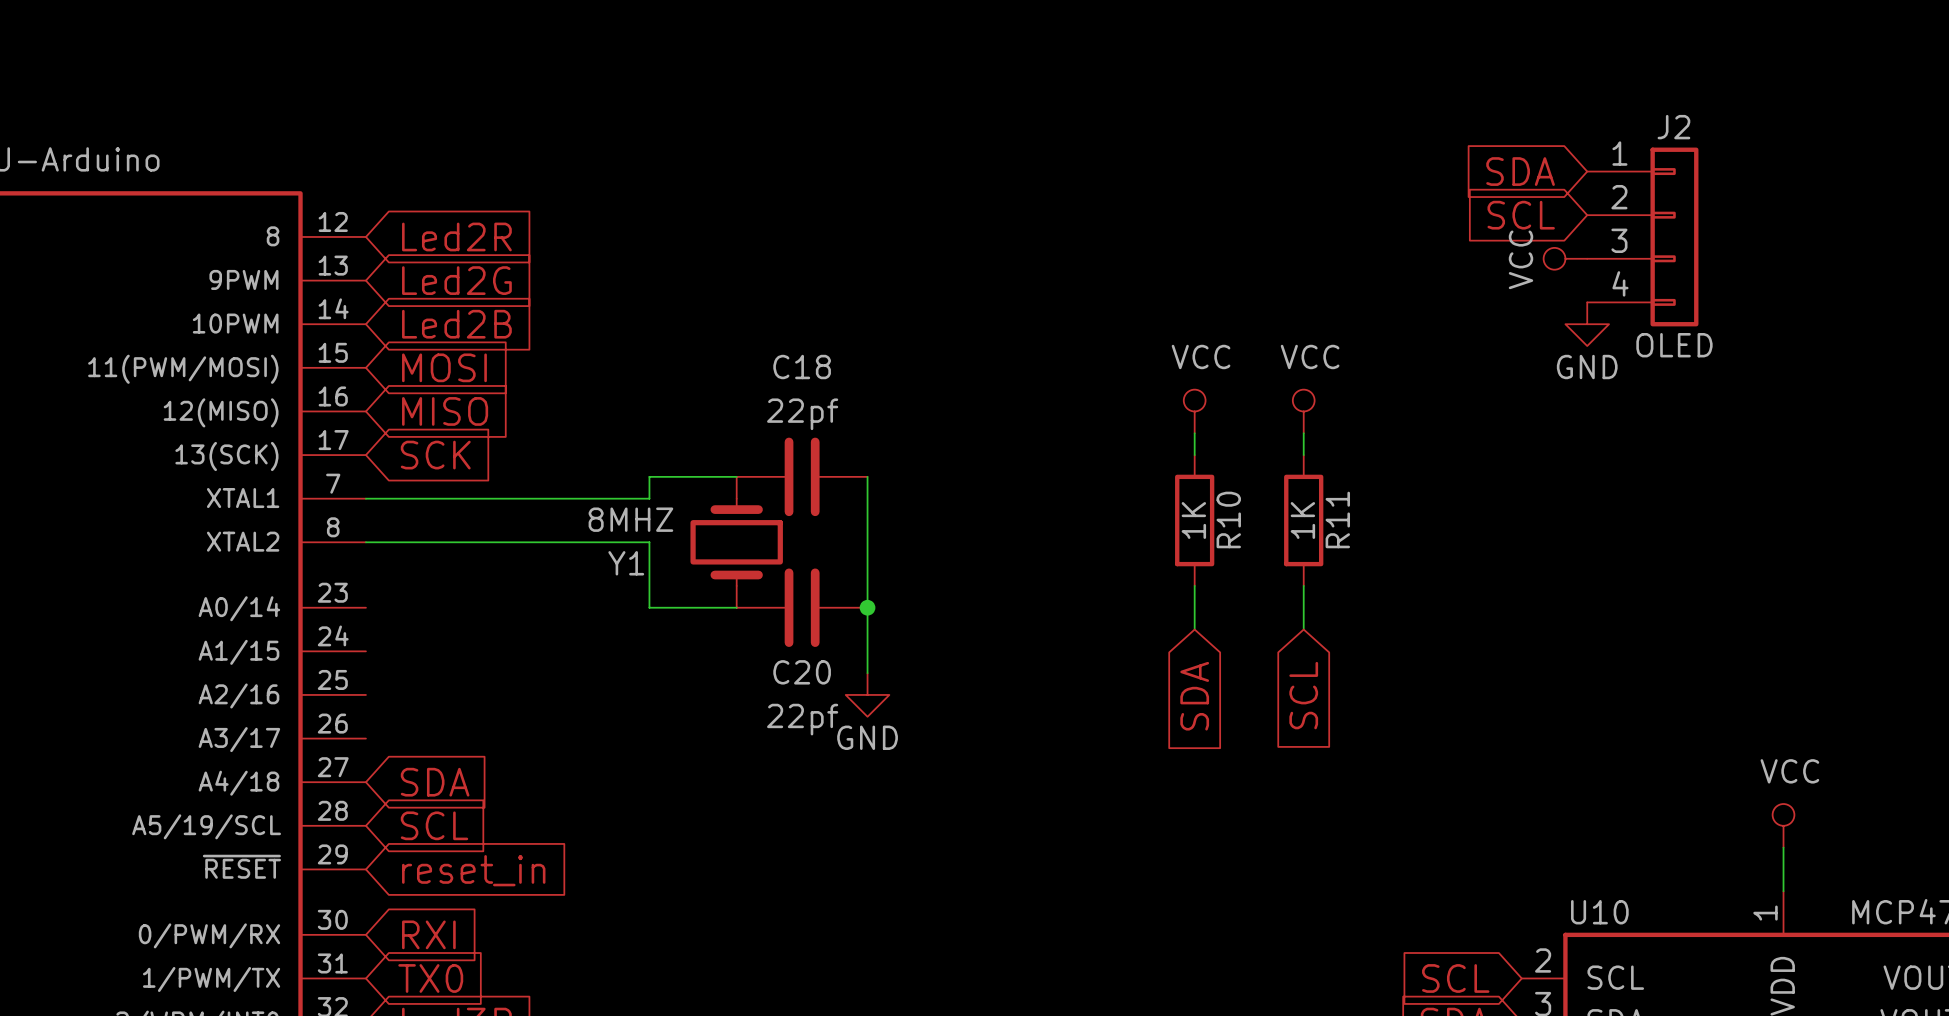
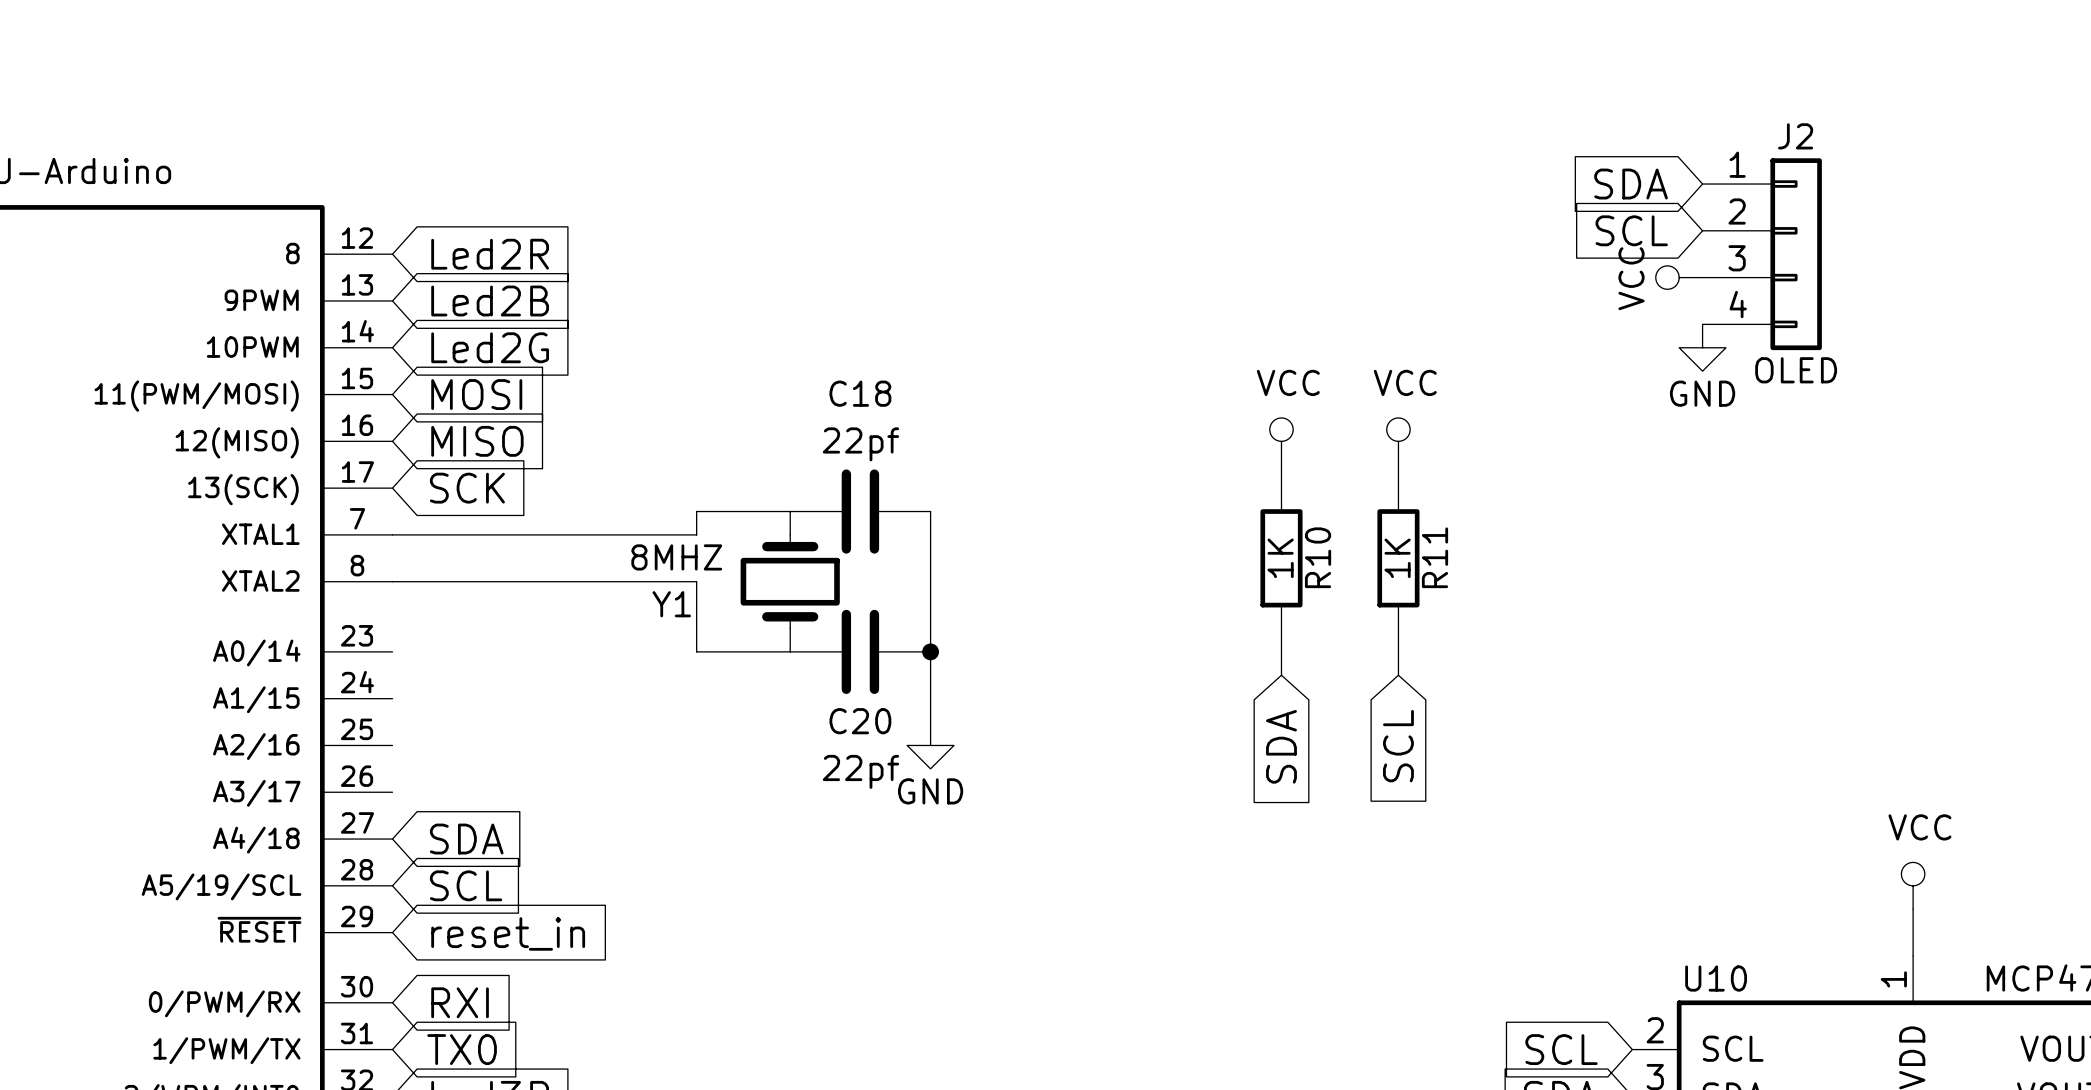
global label: Led2G (456, 280) -> Led2B (490, 300)
global label: Led2B (456, 324) -> Led2G (490, 347)

